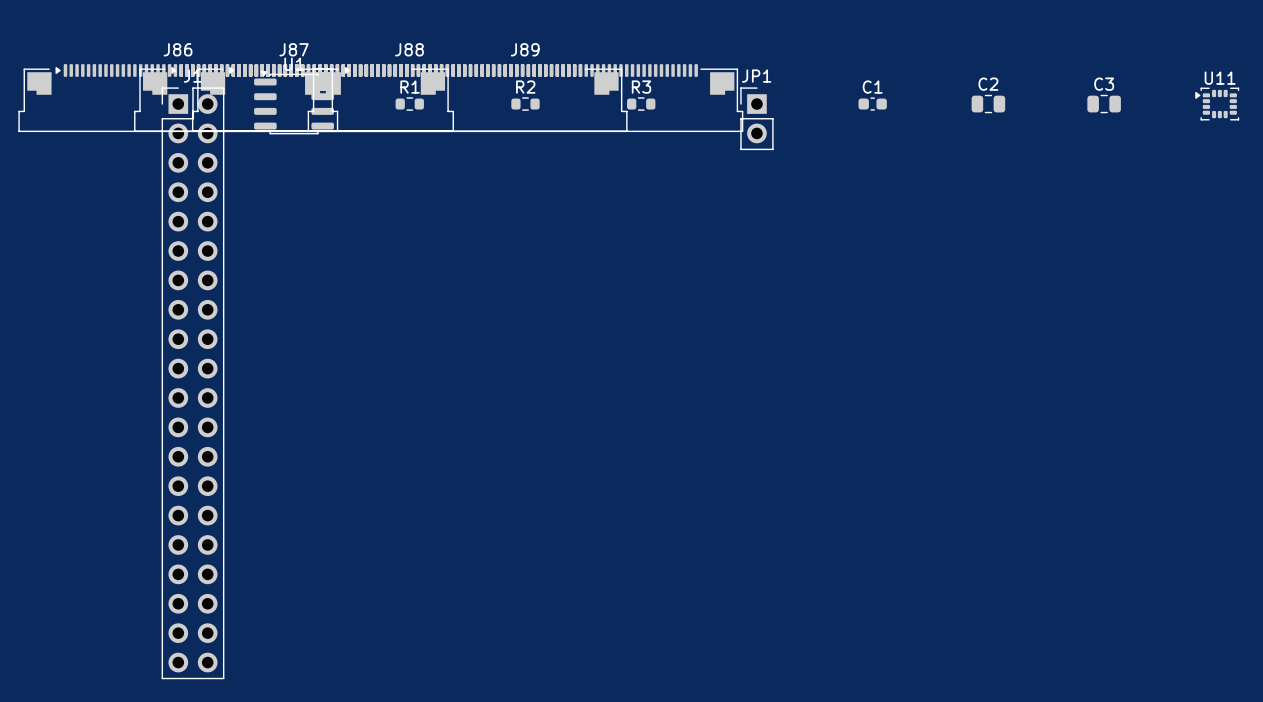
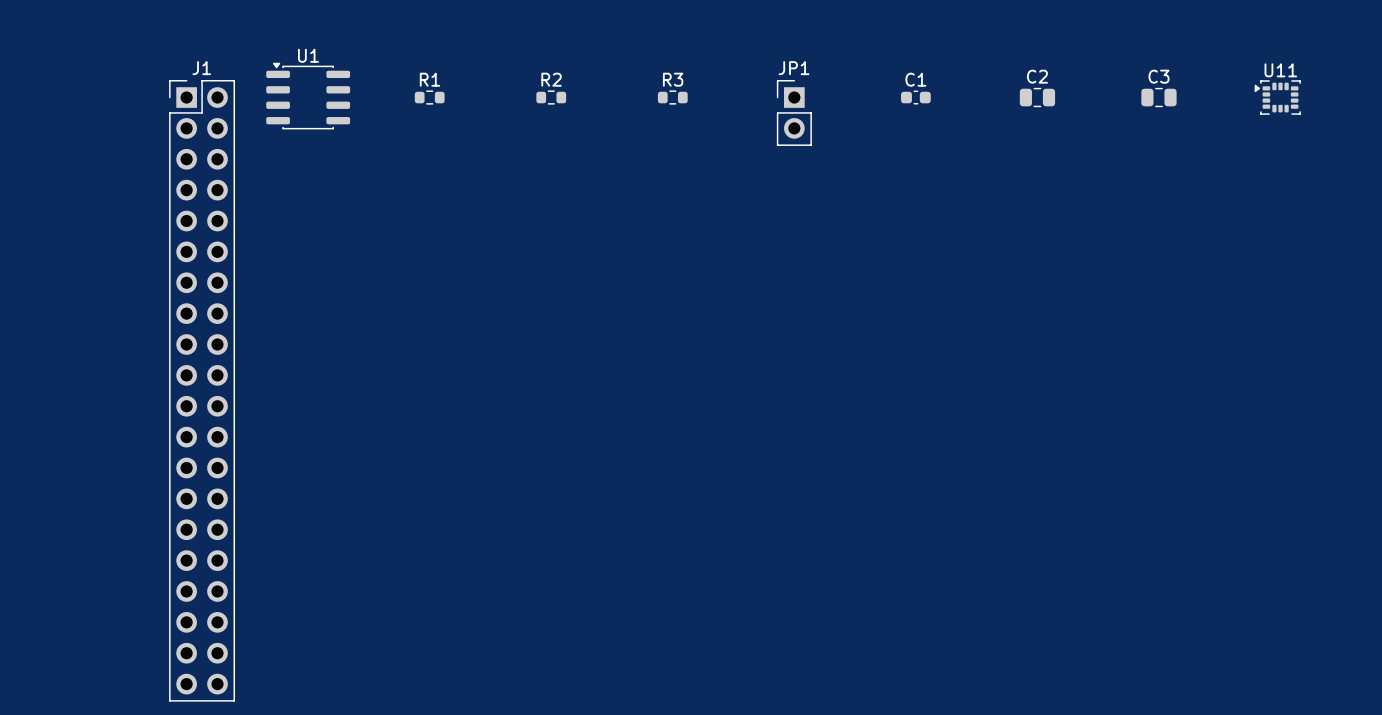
J86: (178, 98) -> none
J87: (294, 98) -> none
J88: (409, 98) -> none
J89: (525, 98) -> none

